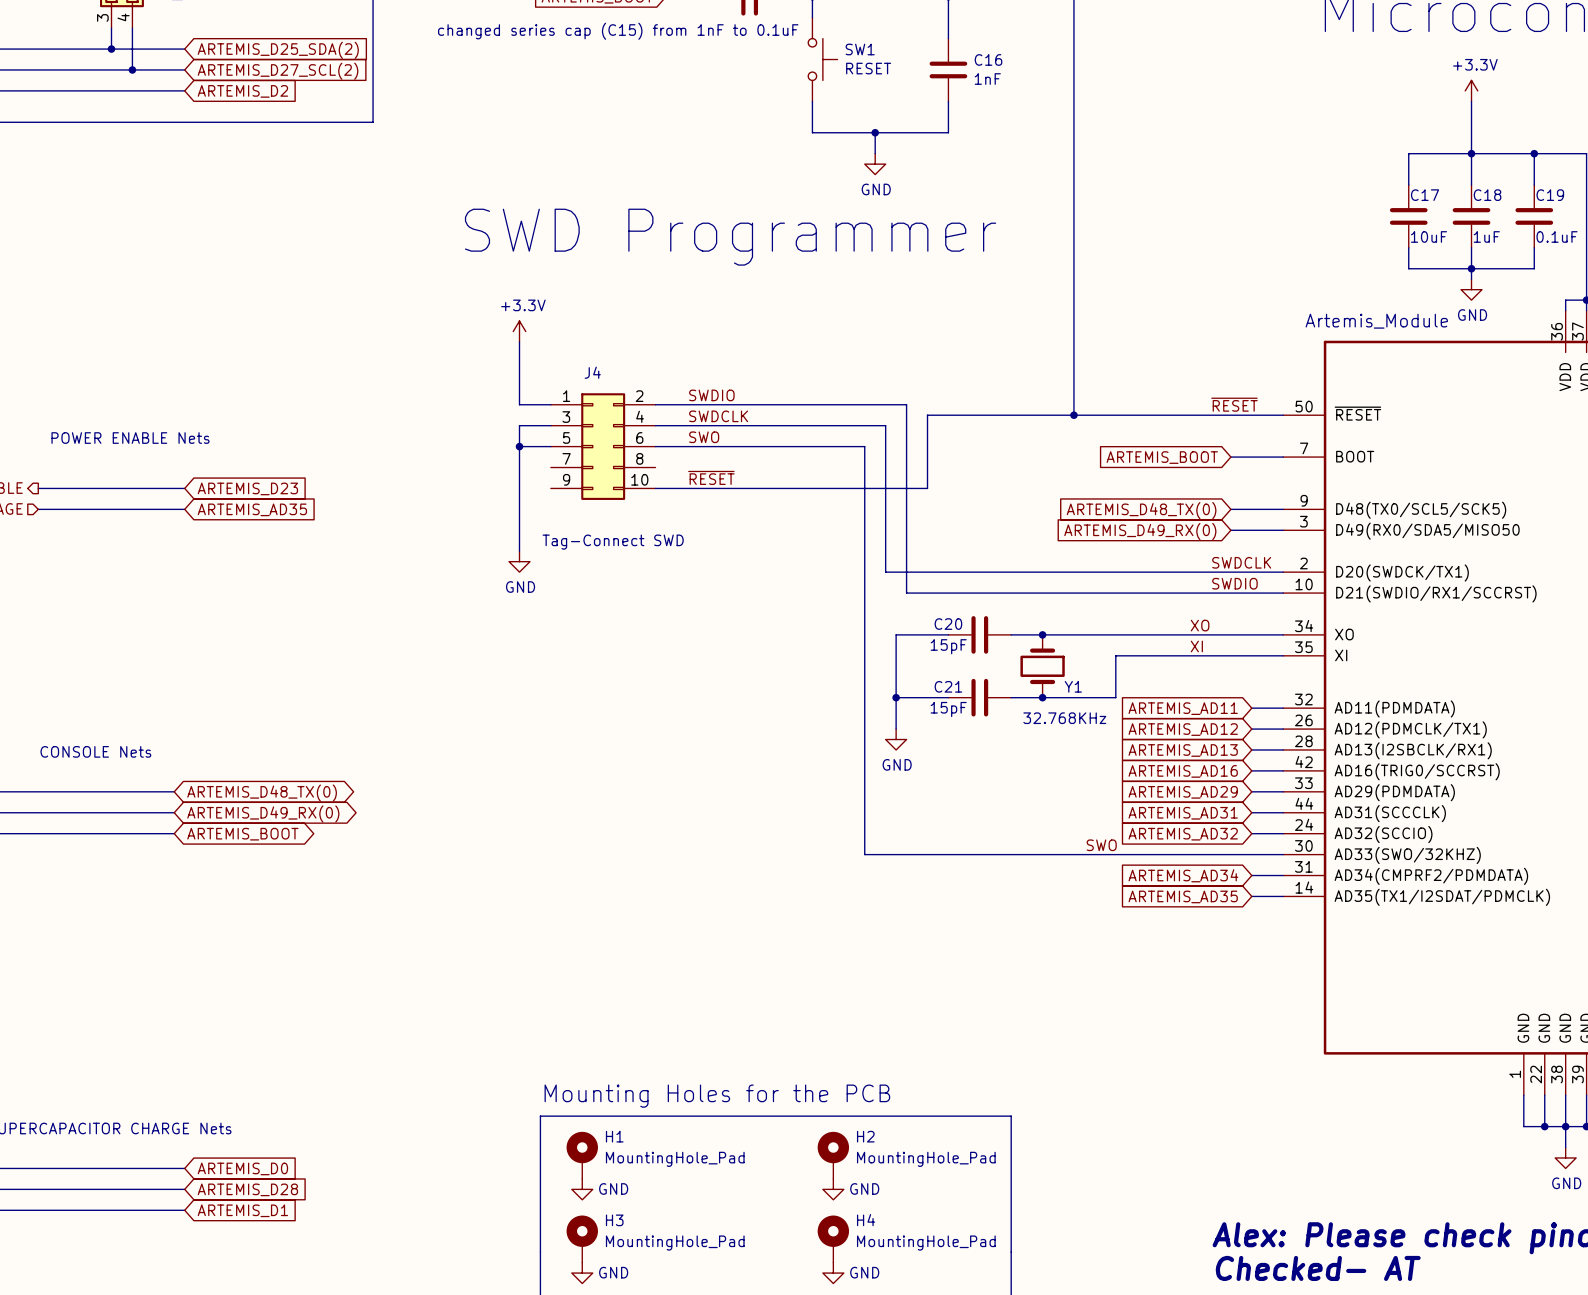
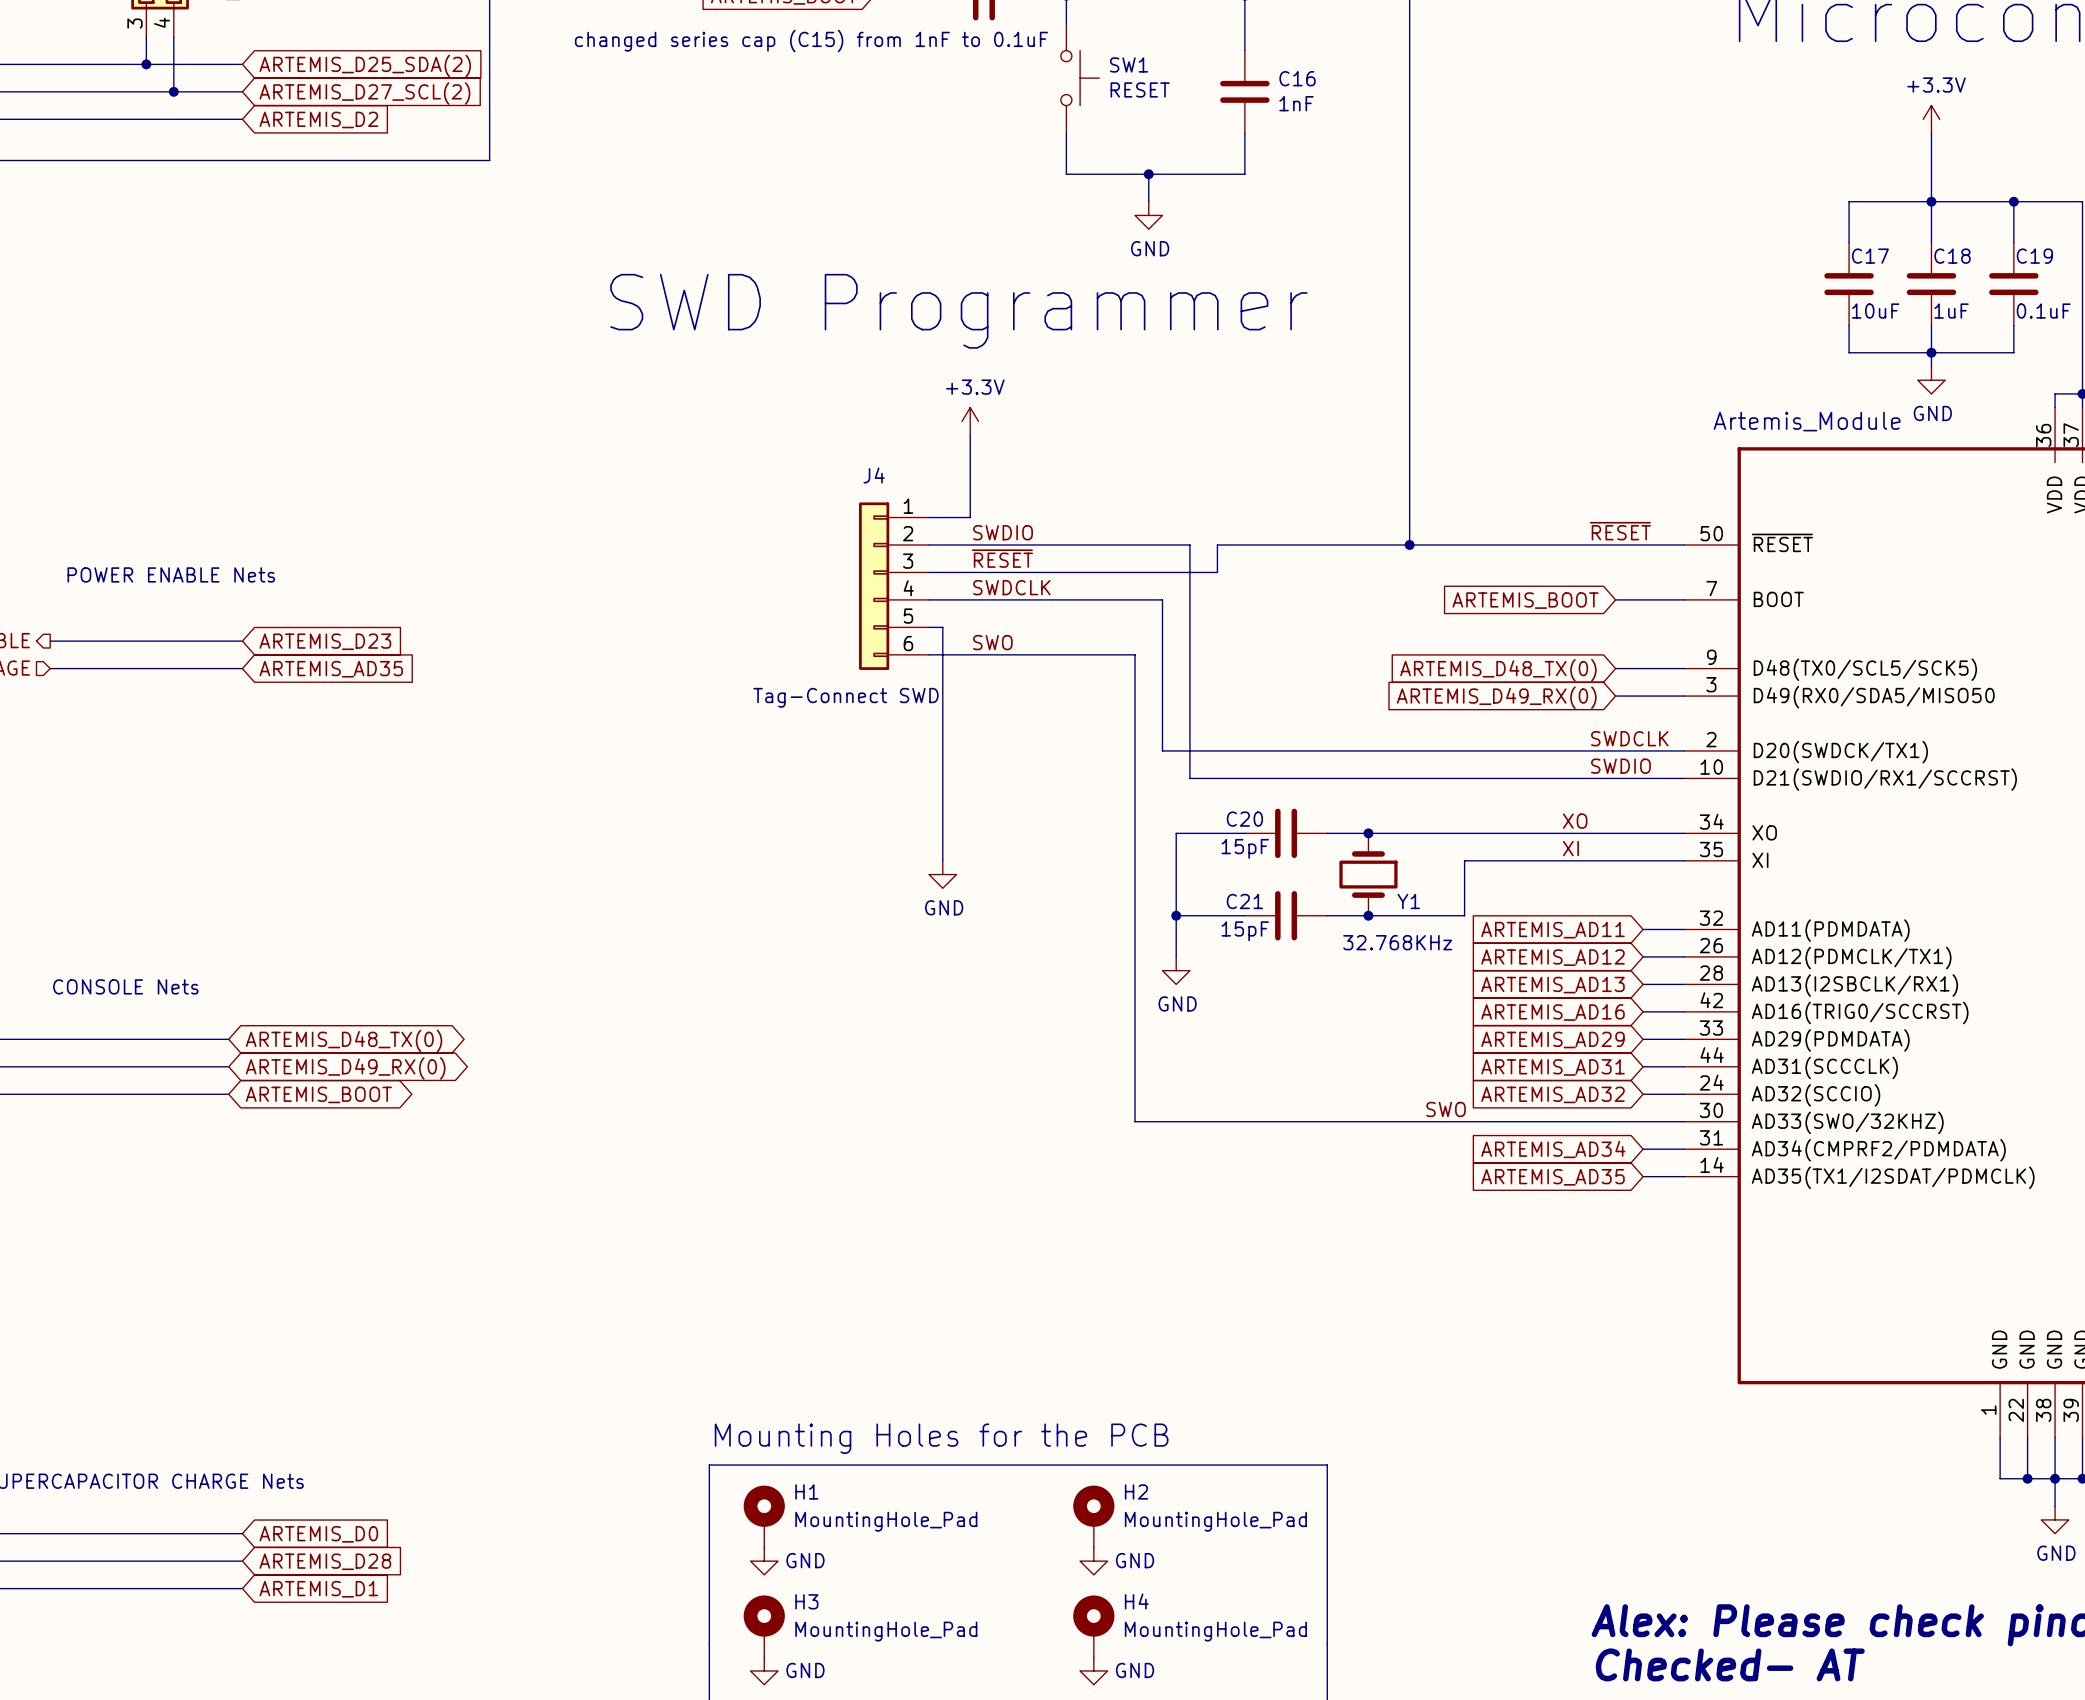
power symbol: none -> +3.3V (970, 421)
power symbol: +3.3V (519, 331) -> none
wire: none -> (970, 435) (970, 517) (929, 517)
wire: (519, 341) (519, 404) (550, 404) -> none
J4 symbol: [550, 393, 656, 500] -> [859, 502, 930, 670]
label position: SWDIO (711, 395) -> SWDIO (1003, 532)
wire: (655, 404) (906, 404) (906, 415) -> (929, 545) (1189, 545)
label position: SWDCLK (718, 416) -> SWDCLK (1011, 587)
wire: (550, 425) (519, 425) (519, 551) -> none
wire: (655, 425) (885, 425) (885, 457) -> (929, 599) (1162, 599)
wire: (927, 436) (927, 488) (655, 488) -> (1217, 572) (929, 572)
label position: SWO (704, 437) -> SWO (992, 642)
wire: (519, 446) (550, 446) -> none
junction: (519, 446) -> none
wire: (655, 446) (864, 446) (864, 498) -> (929, 654) (1135, 654)
wire: none -> (929, 627) (942, 627) (942, 860)
label position: ~{RESET} (711, 477) -> ~{RESET} (1002, 558)
J4 value position: Tag-Connect SWD (613, 542) -> Tag-Connect SWD (846, 697)
power symbol: GND (519, 561) -> none
power symbol: none -> GND (942, 874)

